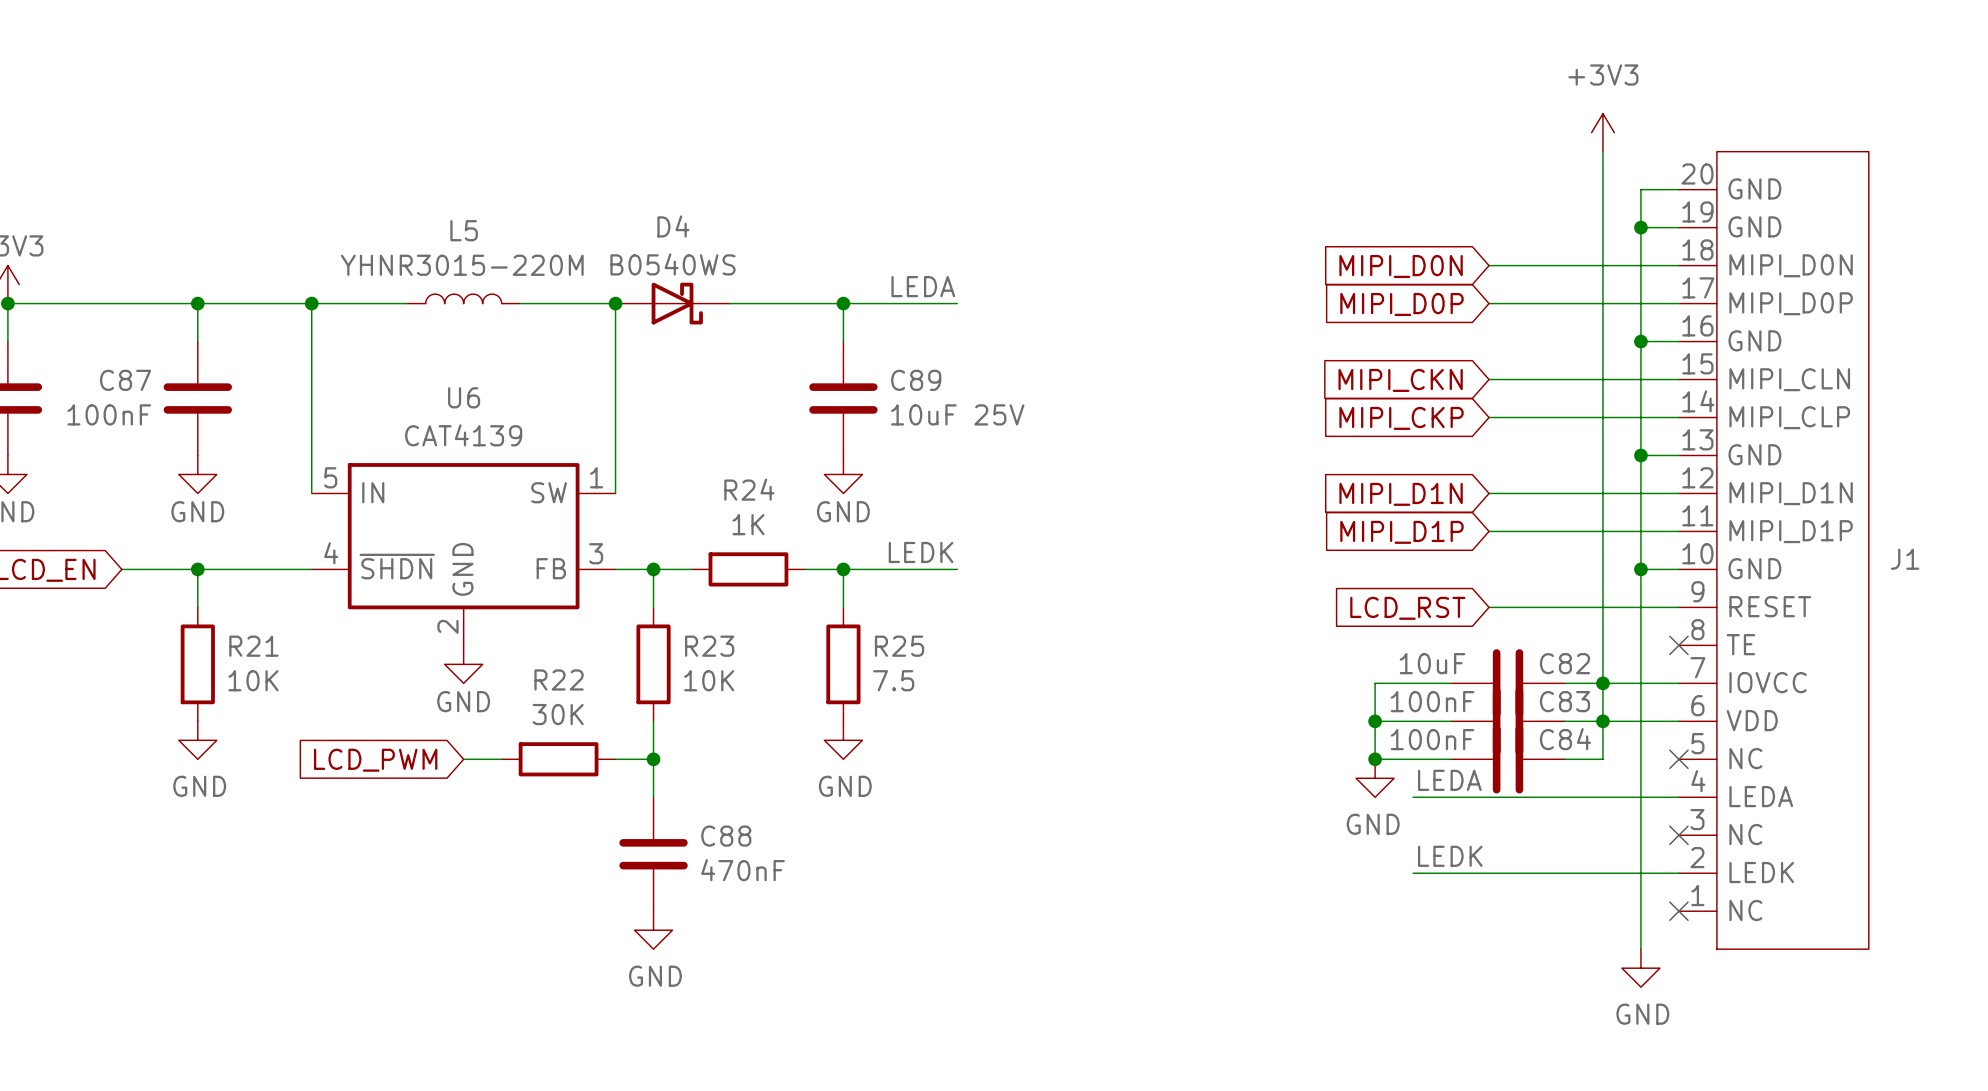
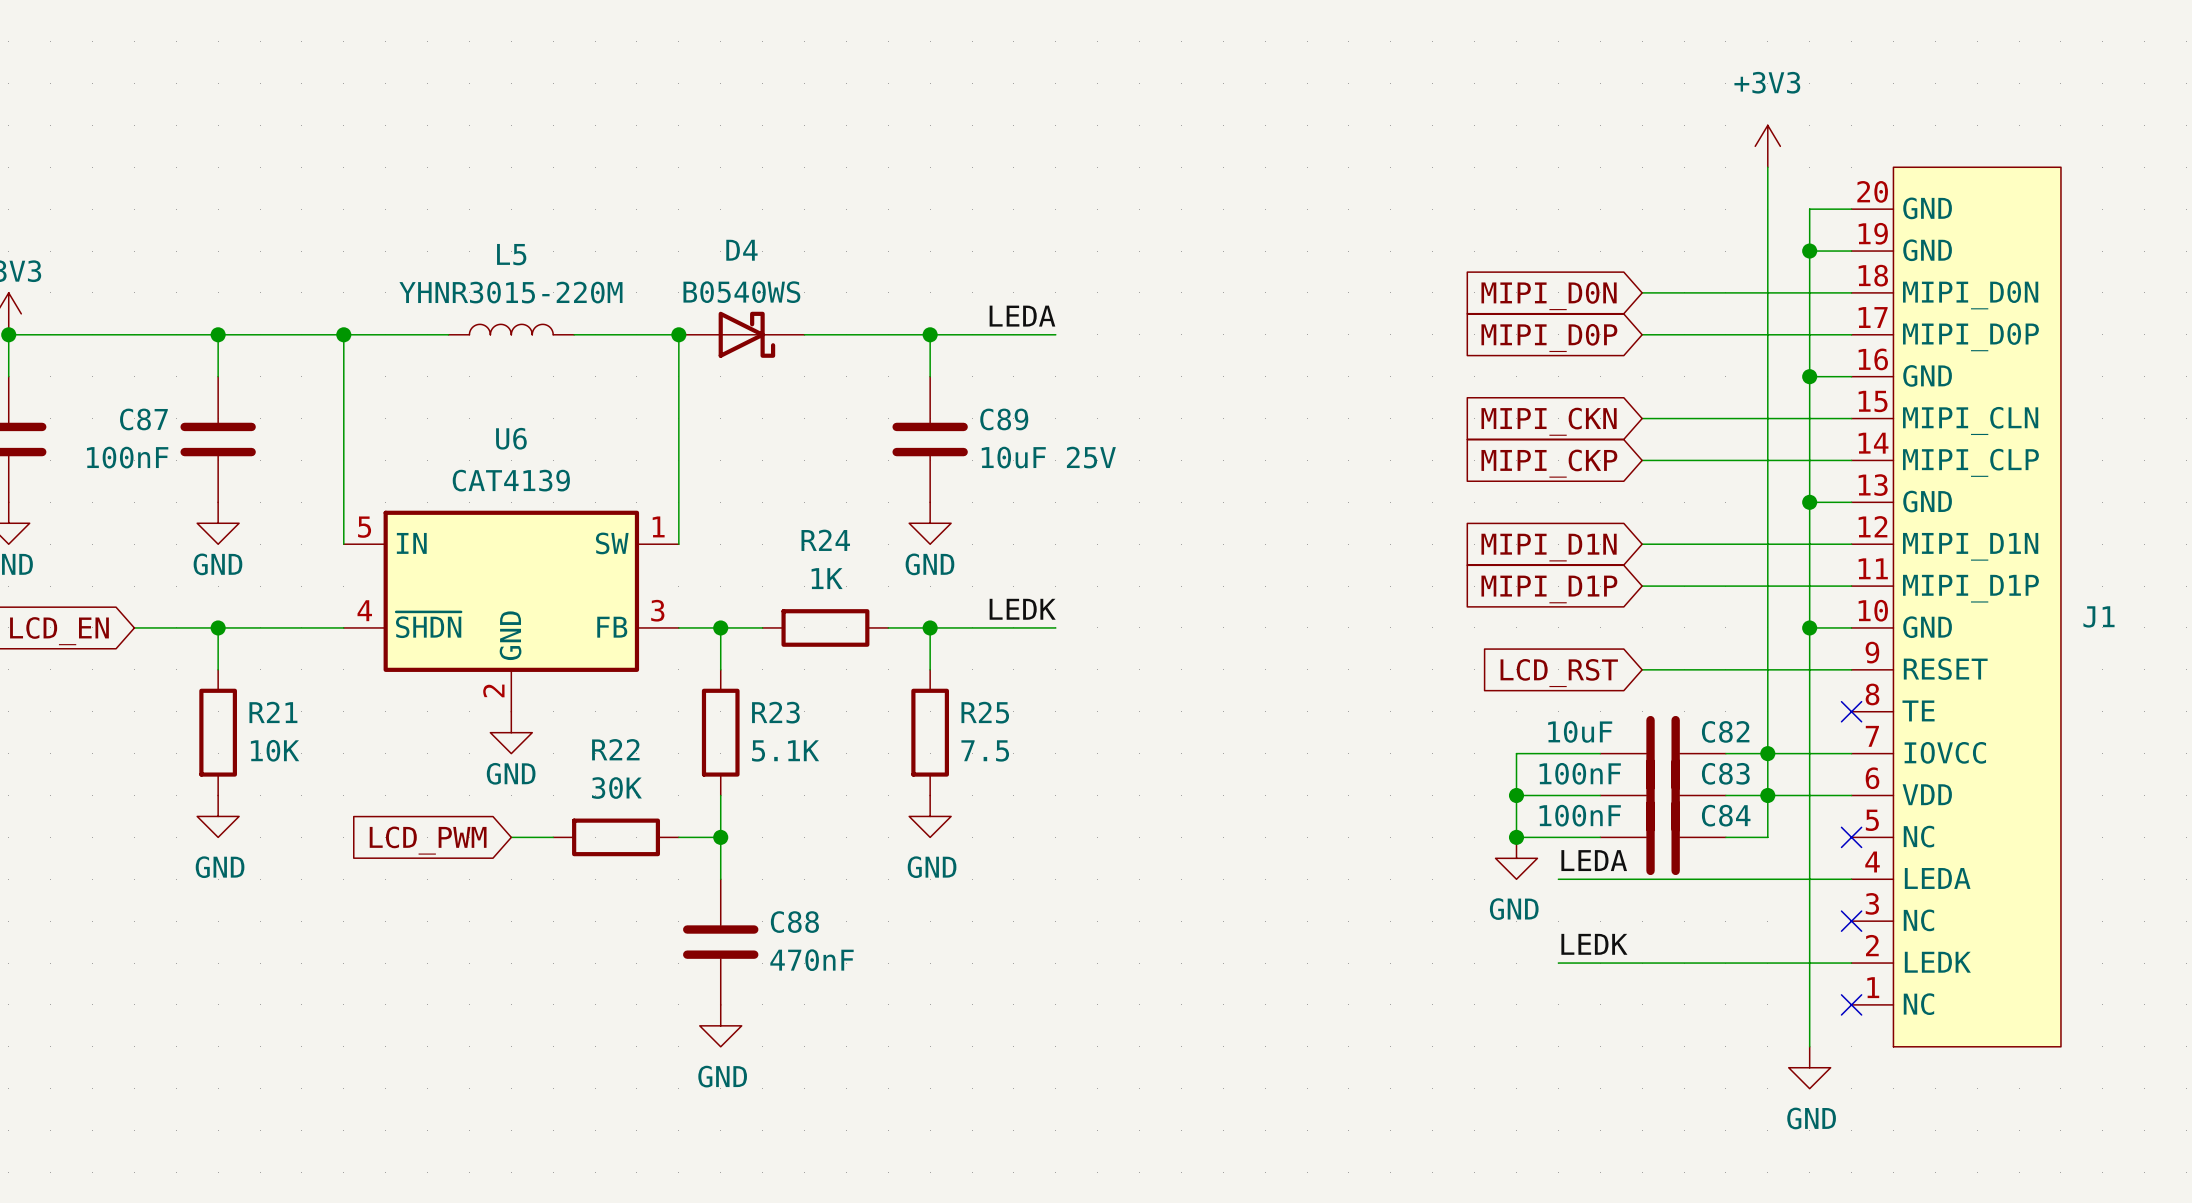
R23 value: 10K (709, 680) -> 5.1K (785, 750)

